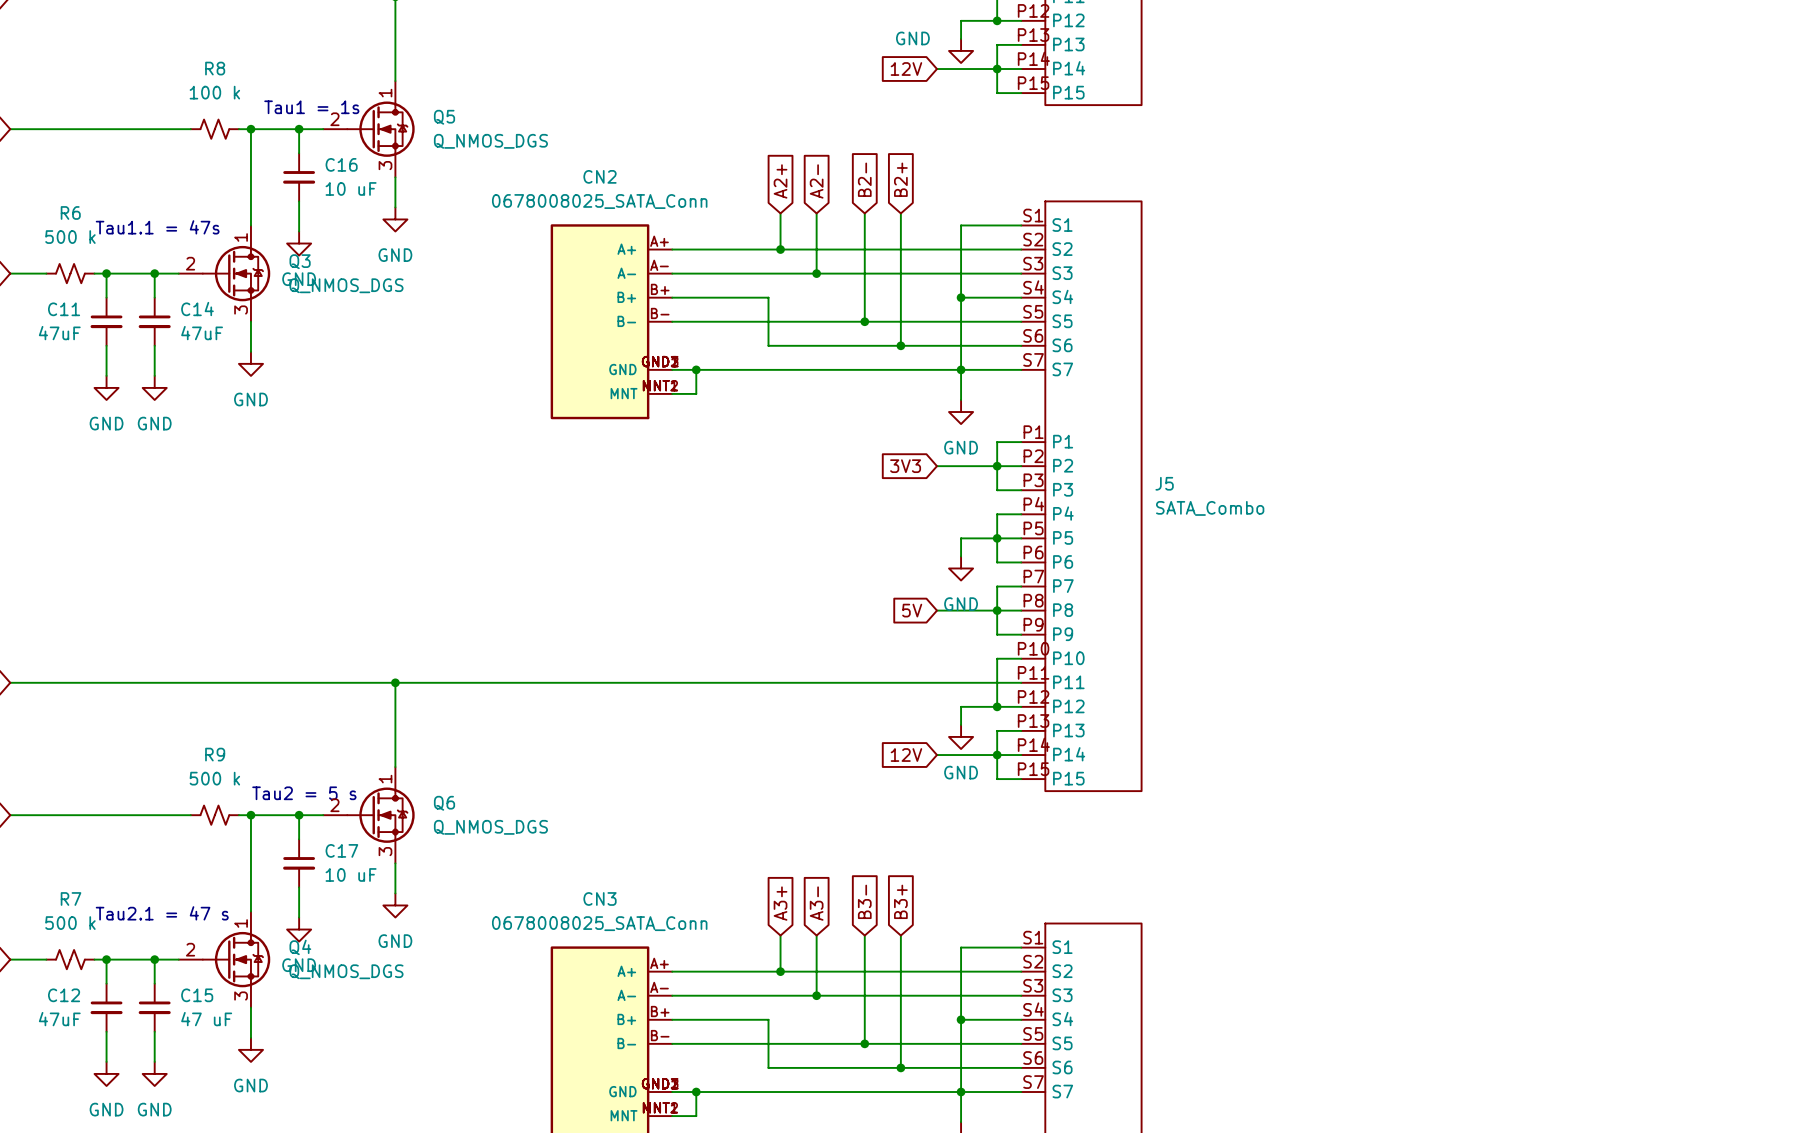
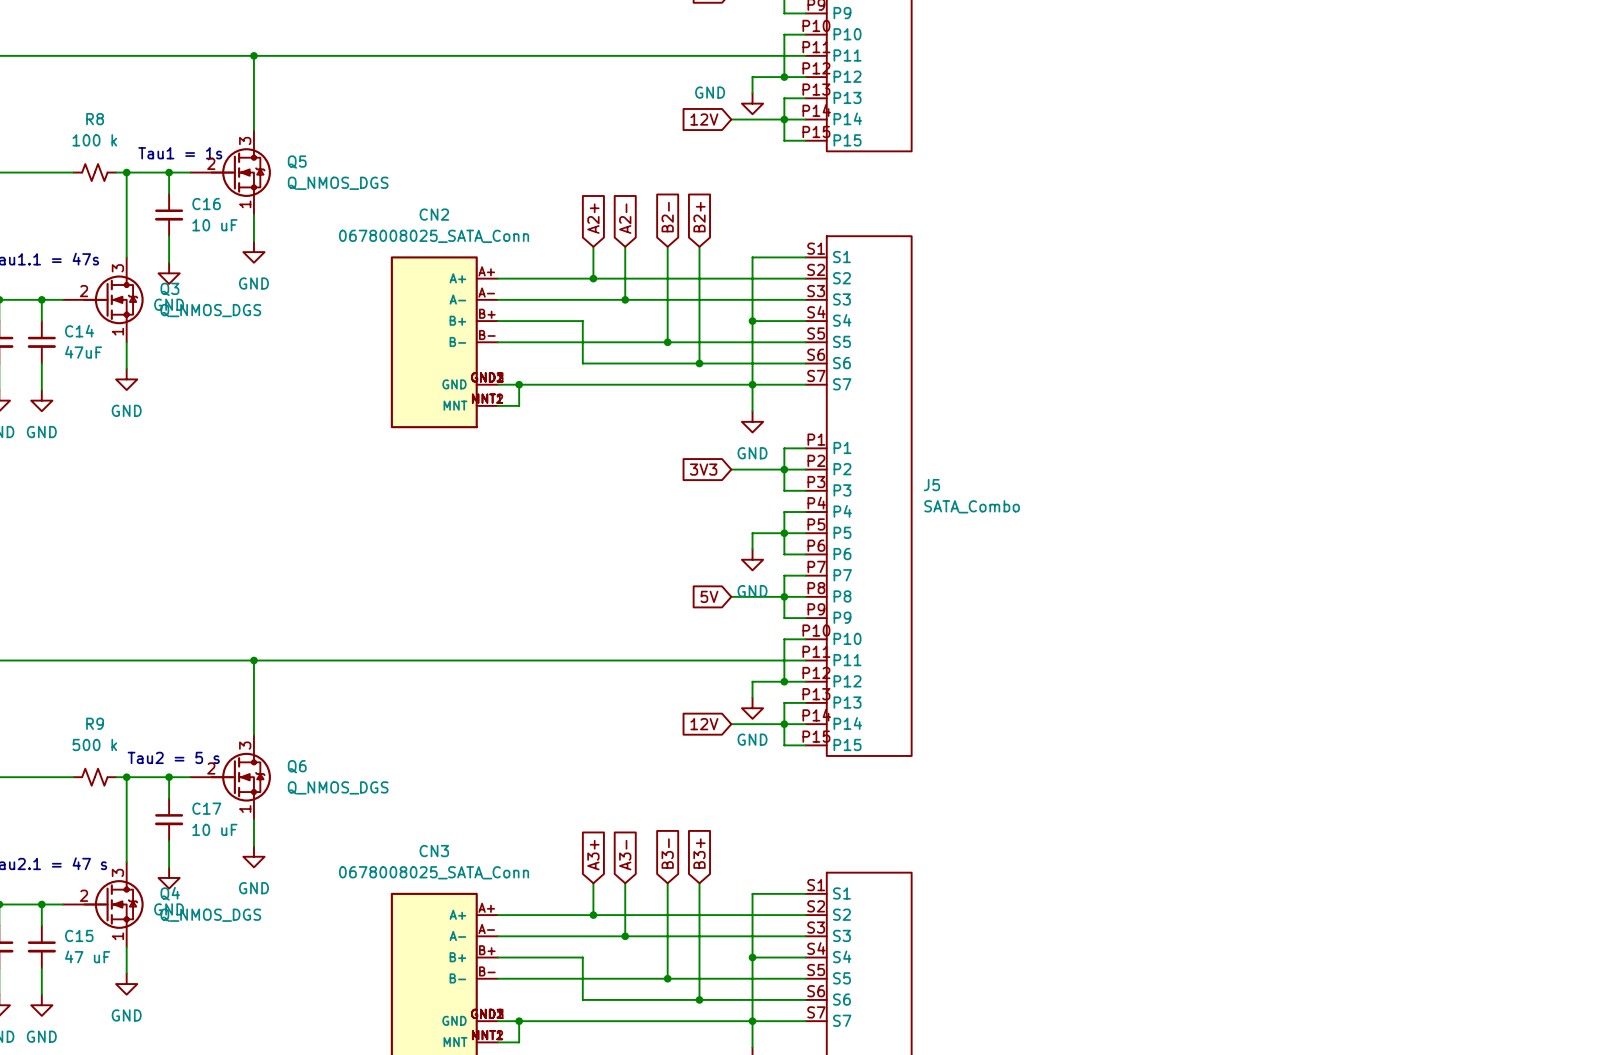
Q5 symbol: [323, 81, 415, 178] -> [190, 130, 271, 215]
Q3 symbol: [178, 225, 271, 322] -> [63, 257, 144, 343]
Q6 symbol: [323, 767, 415, 864] -> [190, 734, 271, 820]
Q4 symbol: [178, 911, 271, 1008] -> [63, 862, 144, 947]

